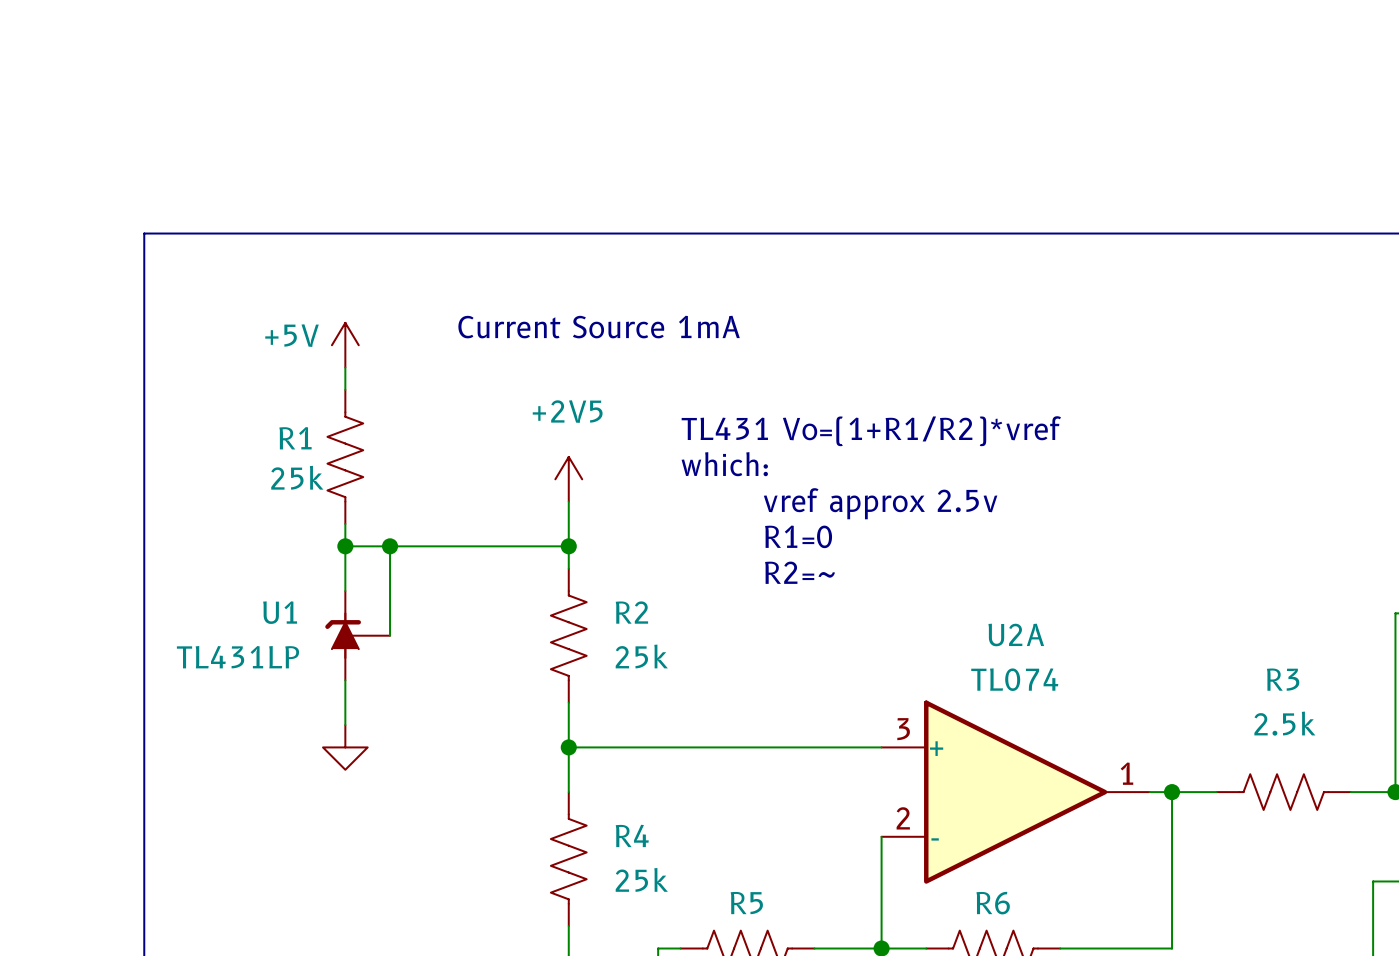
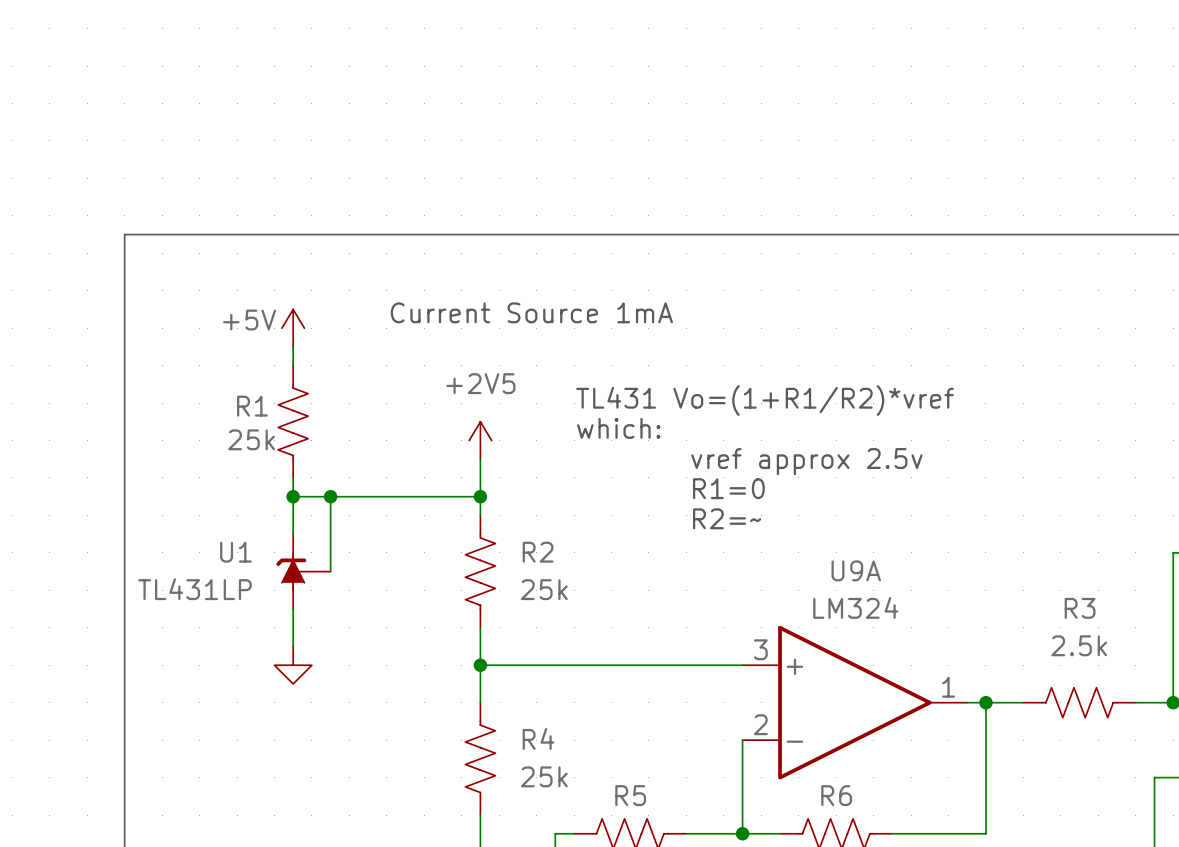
U2A name: U2A (1016, 634) -> U9A (856, 570)
U2A value: TL074 (1014, 679) -> LM324 (855, 607)

